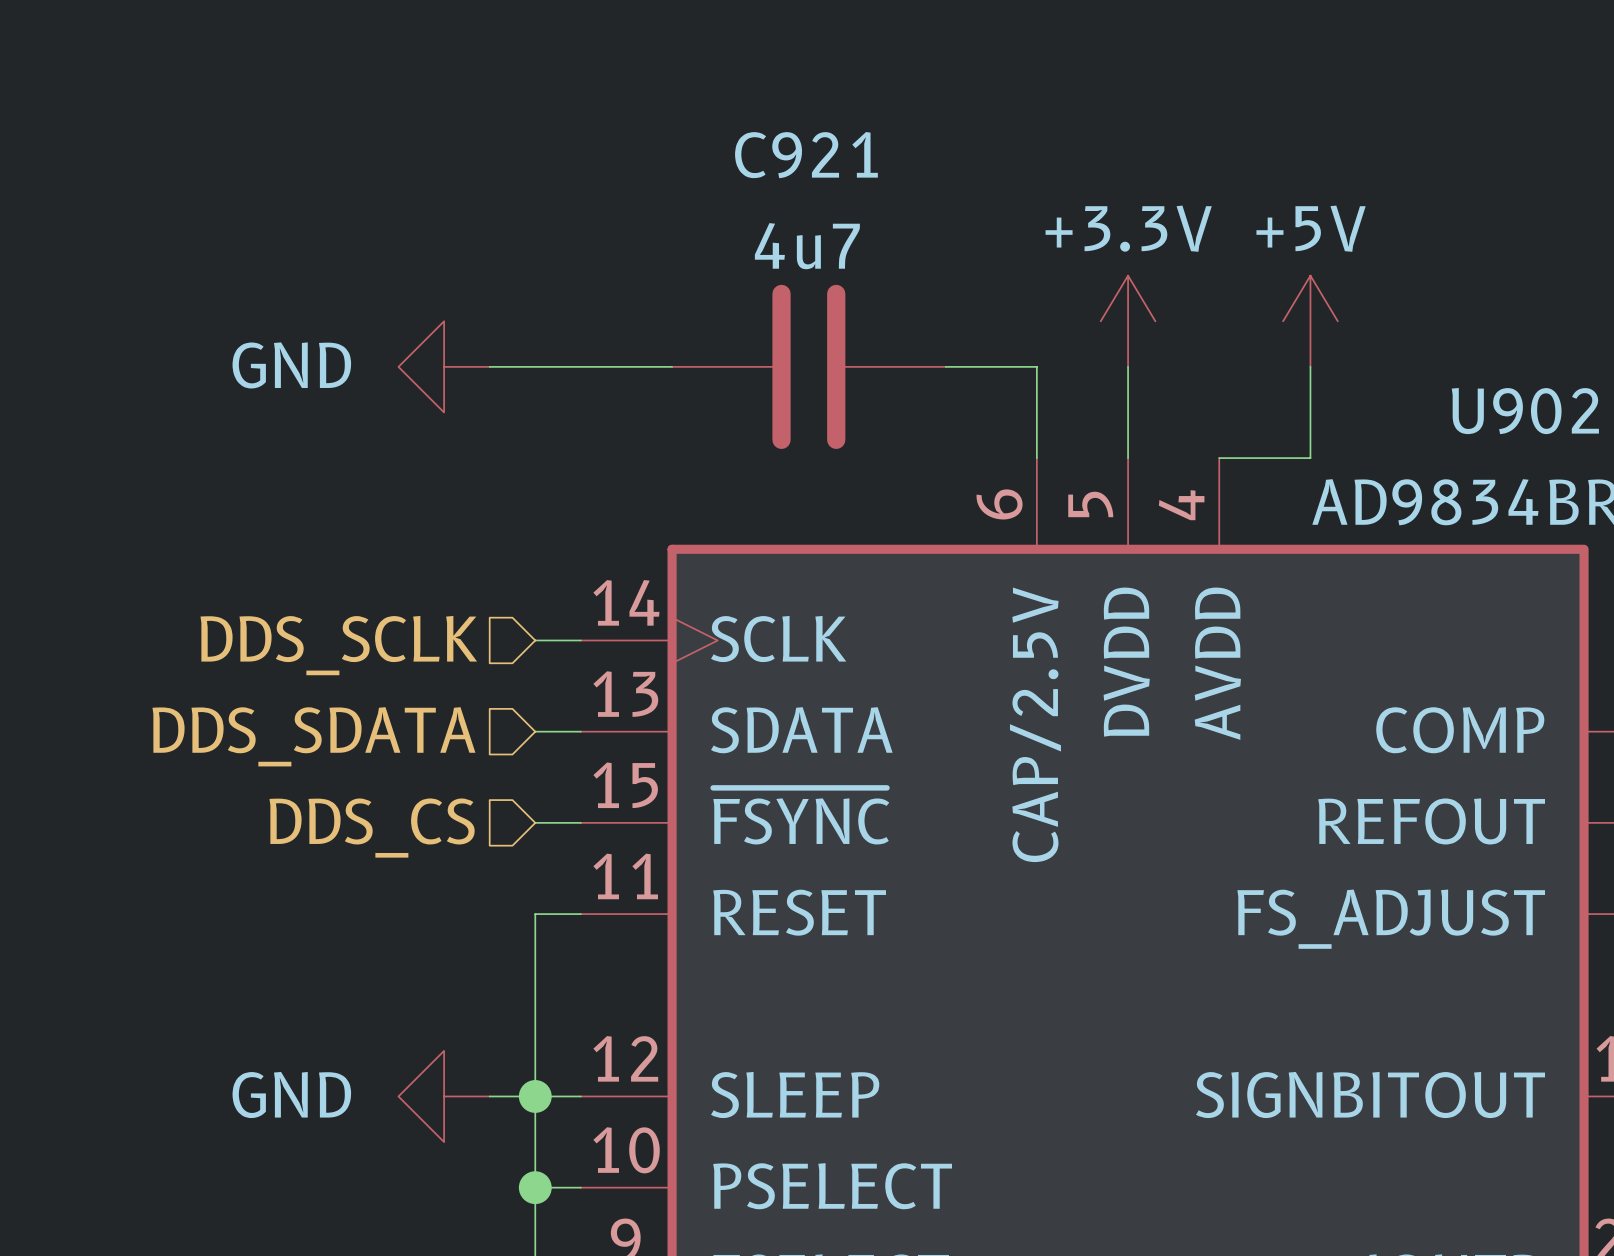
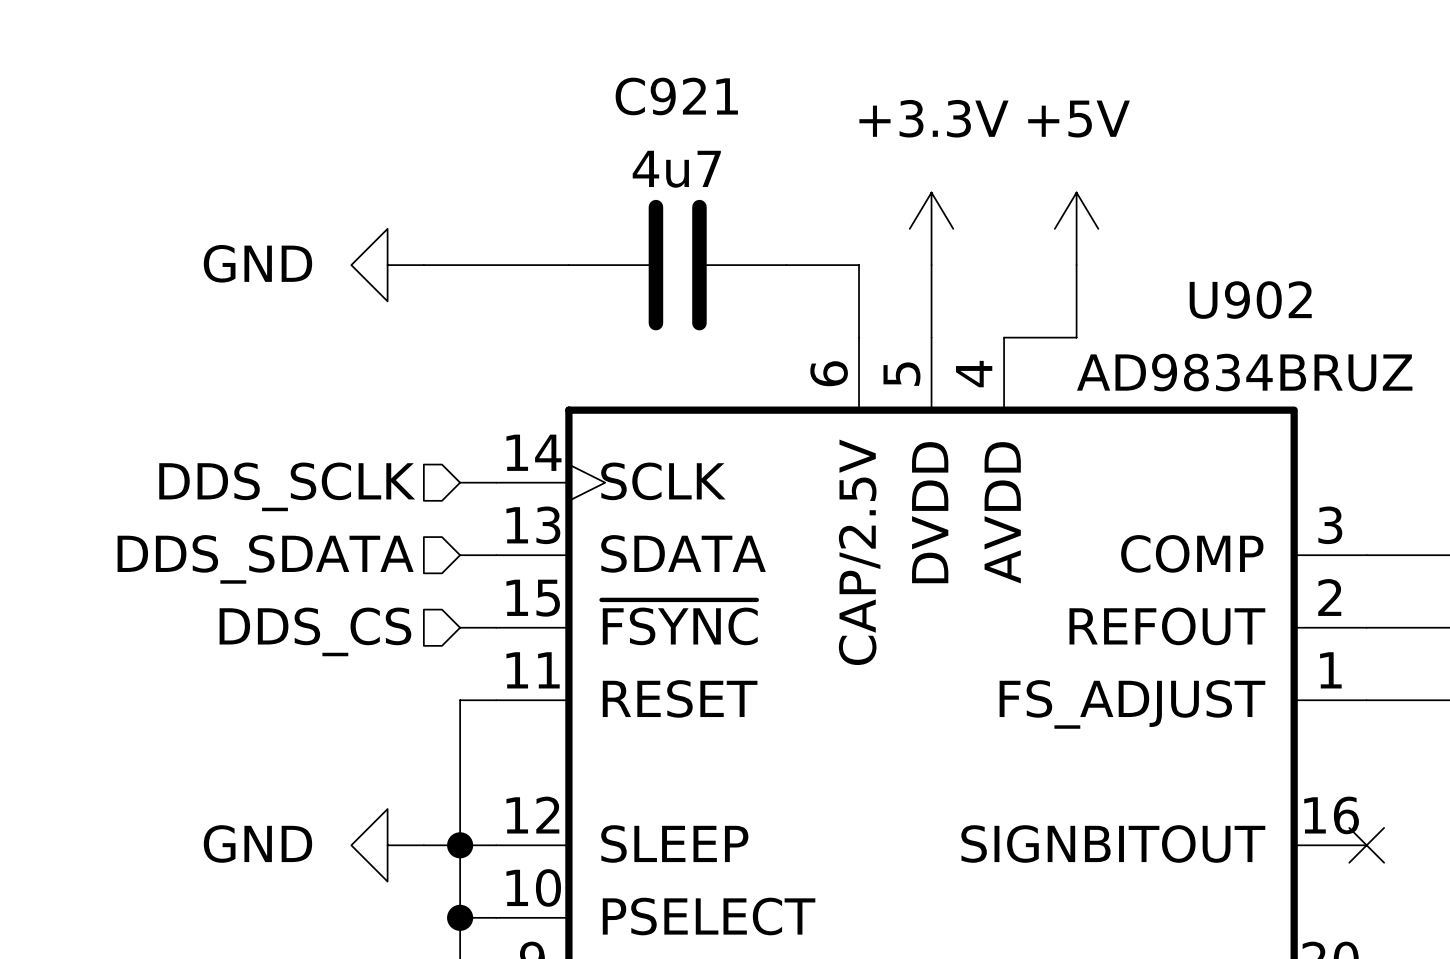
power symbol text position: +3.3V (1128, 228) -> +3.3V (933, 118)
power symbol text position: +5V (1311, 228) -> +5V (1079, 119)

